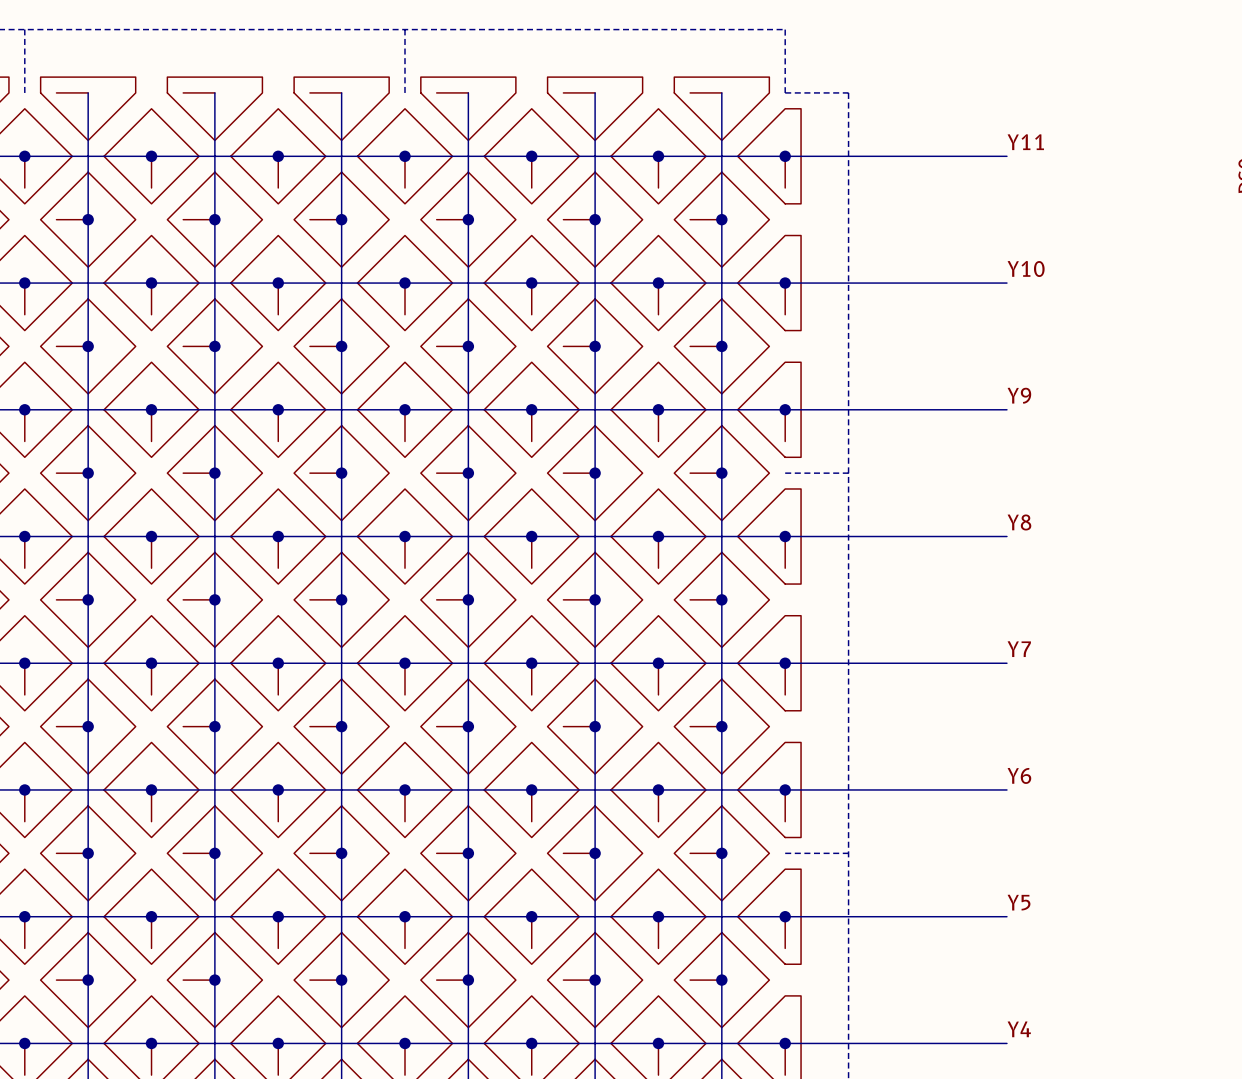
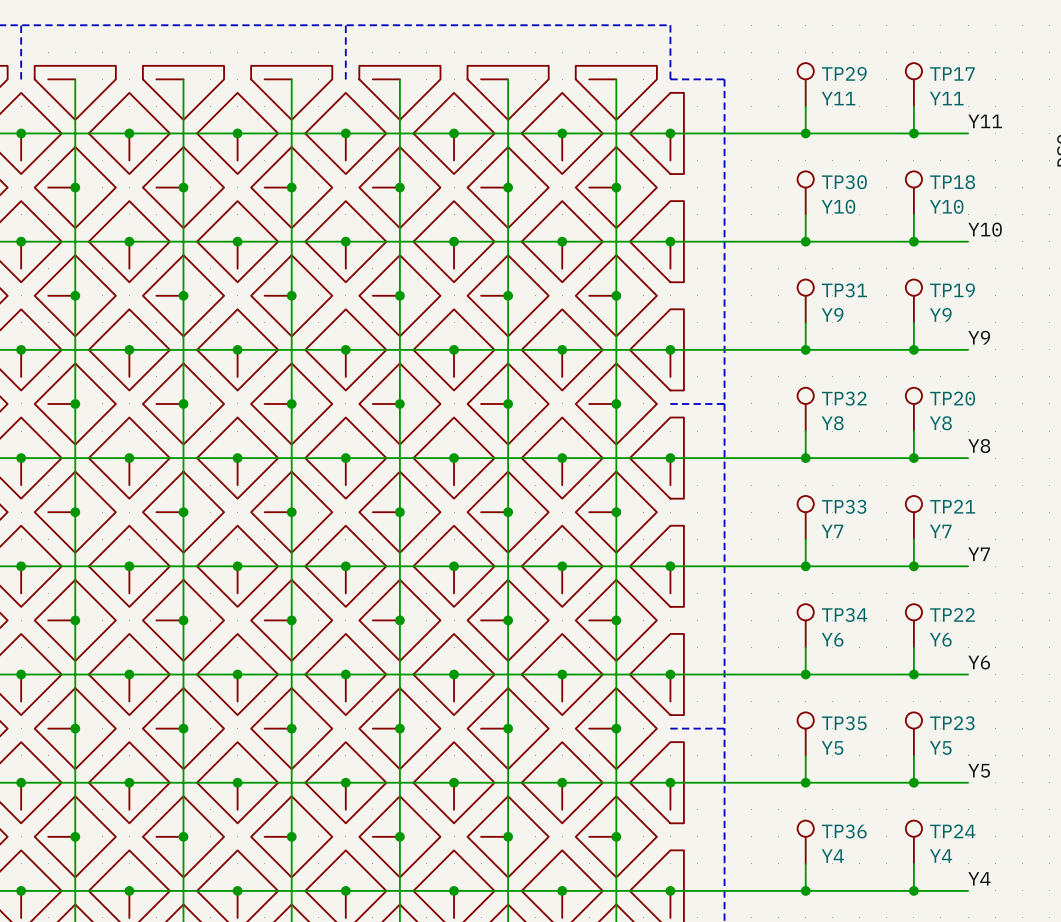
TP29: none -> Y11 (805, 84)
TP17: none -> Y11 (913, 84)
wire: none -> (805, 106) (805, 133)
wire: none -> (913, 106) (913, 133)
label position: Y11 (1025, 142) -> Y11 (985, 121)
junction: none -> (805, 133)
wire: none -> (859, 133) (968, 133)
junction: none -> (913, 133)
TP30: none -> Y10 (805, 192)
TP18: none -> Y10 (913, 192)
wire: none -> (805, 214) (805, 241)
wire: none -> (913, 214) (913, 241)
label position: Y10 (1026, 269) -> Y10 (985, 229)
junction: none -> (805, 241)
wire: none -> (859, 241) (968, 241)
junction: none -> (913, 241)
TP31: none -> Y9 (805, 301)
TP19: none -> Y9 (913, 301)
wire: none -> (805, 322) (805, 349)
wire: none -> (913, 322) (913, 349)
label position: Y9 (1019, 395) -> Y9 (979, 337)
junction: none -> (805, 349)
wire: none -> (859, 349) (968, 349)
junction: none -> (913, 349)
TP32: none -> Y8 (805, 409)
TP20: none -> Y8 (913, 409)
wire: none -> (805, 431) (805, 458)
wire: none -> (913, 431) (913, 458)
label position: Y8 (1019, 522) -> Y8 (979, 446)
junction: none -> (805, 458)
wire: none -> (859, 458) (968, 458)
junction: none -> (913, 458)
TP33: none -> Y7 (805, 517)
TP21: none -> Y7 (913, 517)
wire: none -> (805, 539) (805, 566)
wire: none -> (913, 539) (913, 566)
label position: Y7 (1019, 649) -> Y7 (979, 554)
junction: none -> (805, 566)
wire: none -> (859, 566) (968, 566)
junction: none -> (913, 566)
TP34: none -> Y6 (805, 625)
TP22: none -> Y6 (913, 625)
wire: none -> (805, 647) (805, 674)
wire: none -> (913, 647) (913, 674)
label position: Y6 (1019, 775) -> Y6 (979, 662)
junction: none -> (805, 674)
wire: none -> (859, 674) (968, 674)
junction: none -> (913, 674)
TP35: none -> Y5 (805, 734)
TP23: none -> Y5 (913, 734)
wire: none -> (805, 755) (805, 782)
wire: none -> (913, 755) (913, 782)
label position: Y5 (1019, 902) -> Y5 (979, 770)
junction: none -> (805, 782)
wire: none -> (859, 782) (968, 782)
junction: none -> (913, 782)
TP36: none -> Y4 (805, 842)
TP24: none -> Y4 (913, 842)
wire: none -> (805, 863) (805, 890)
wire: none -> (913, 863) (913, 890)
label position: Y4 (1019, 1029) -> Y4 (979, 878)
junction: none -> (805, 890)
wire: none -> (859, 890) (968, 890)
junction: none -> (913, 890)

